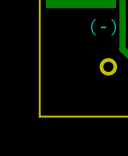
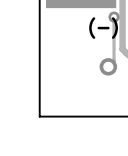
track: none -> (114, 17) (114, 61) (108, 66)
via: none -> (114, 17)

